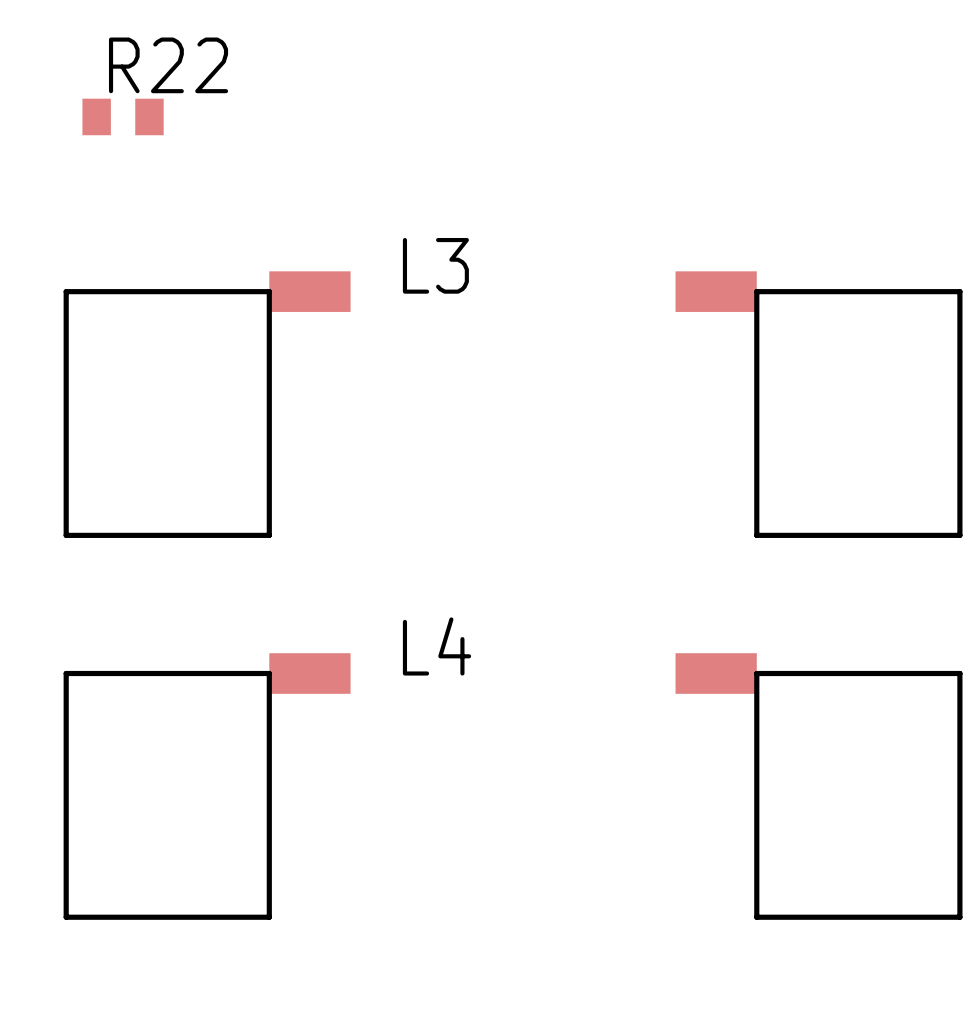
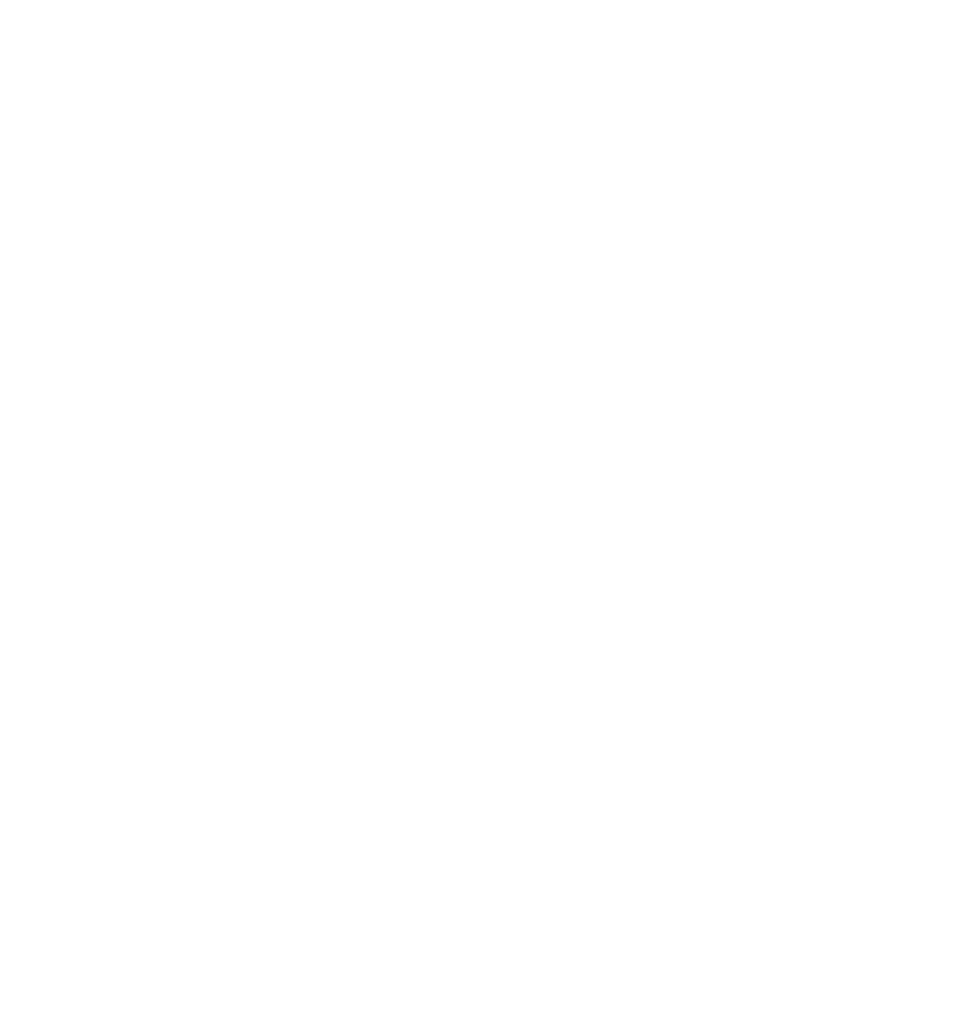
R22: (123, 116) -> none
L3: (513, 404) -> none
L4: (513, 786) -> none

